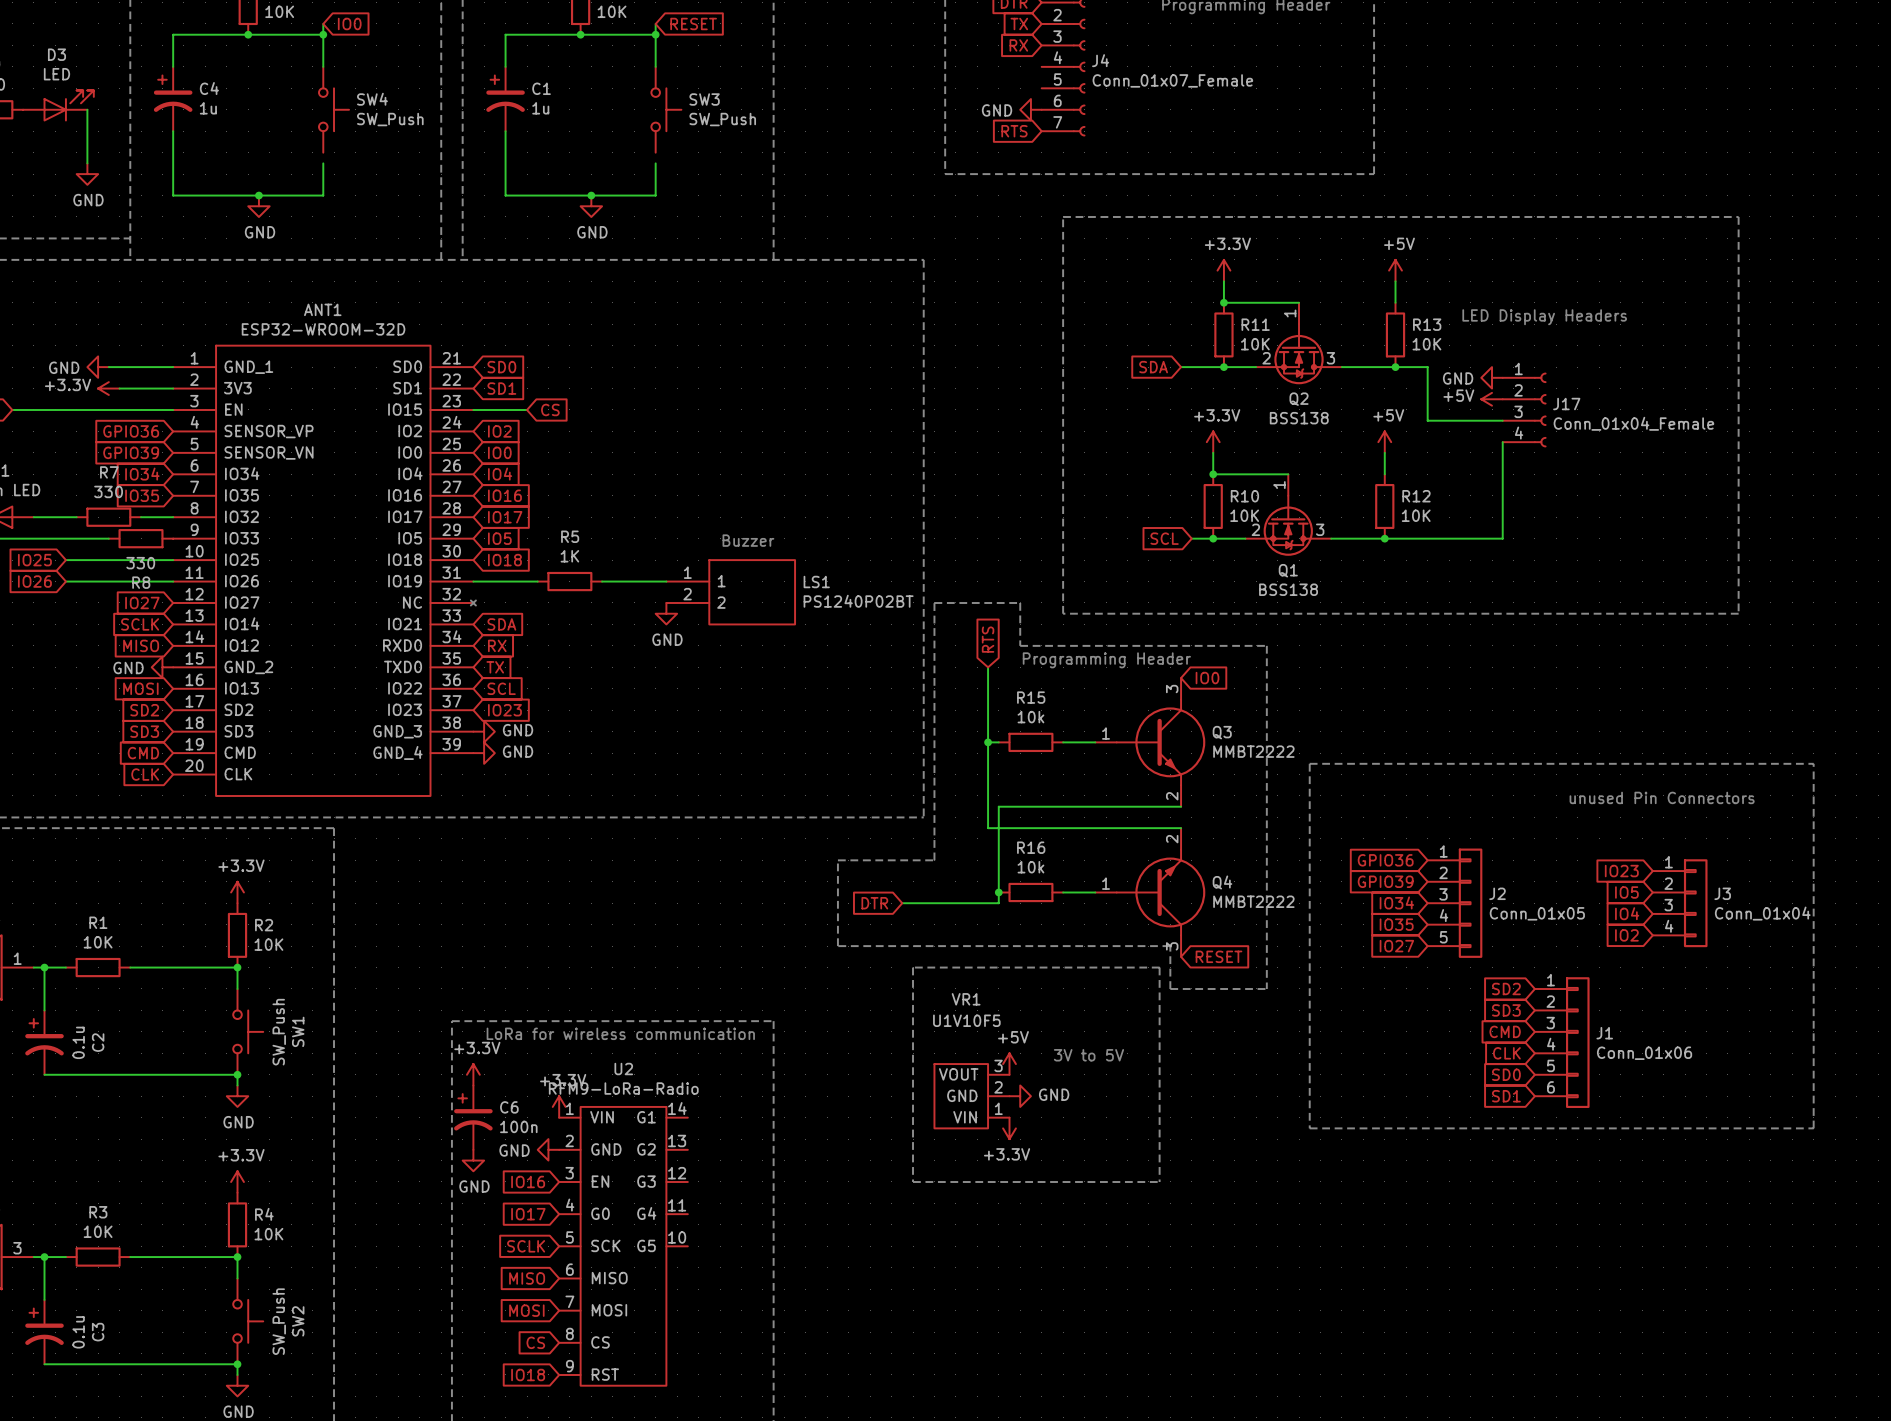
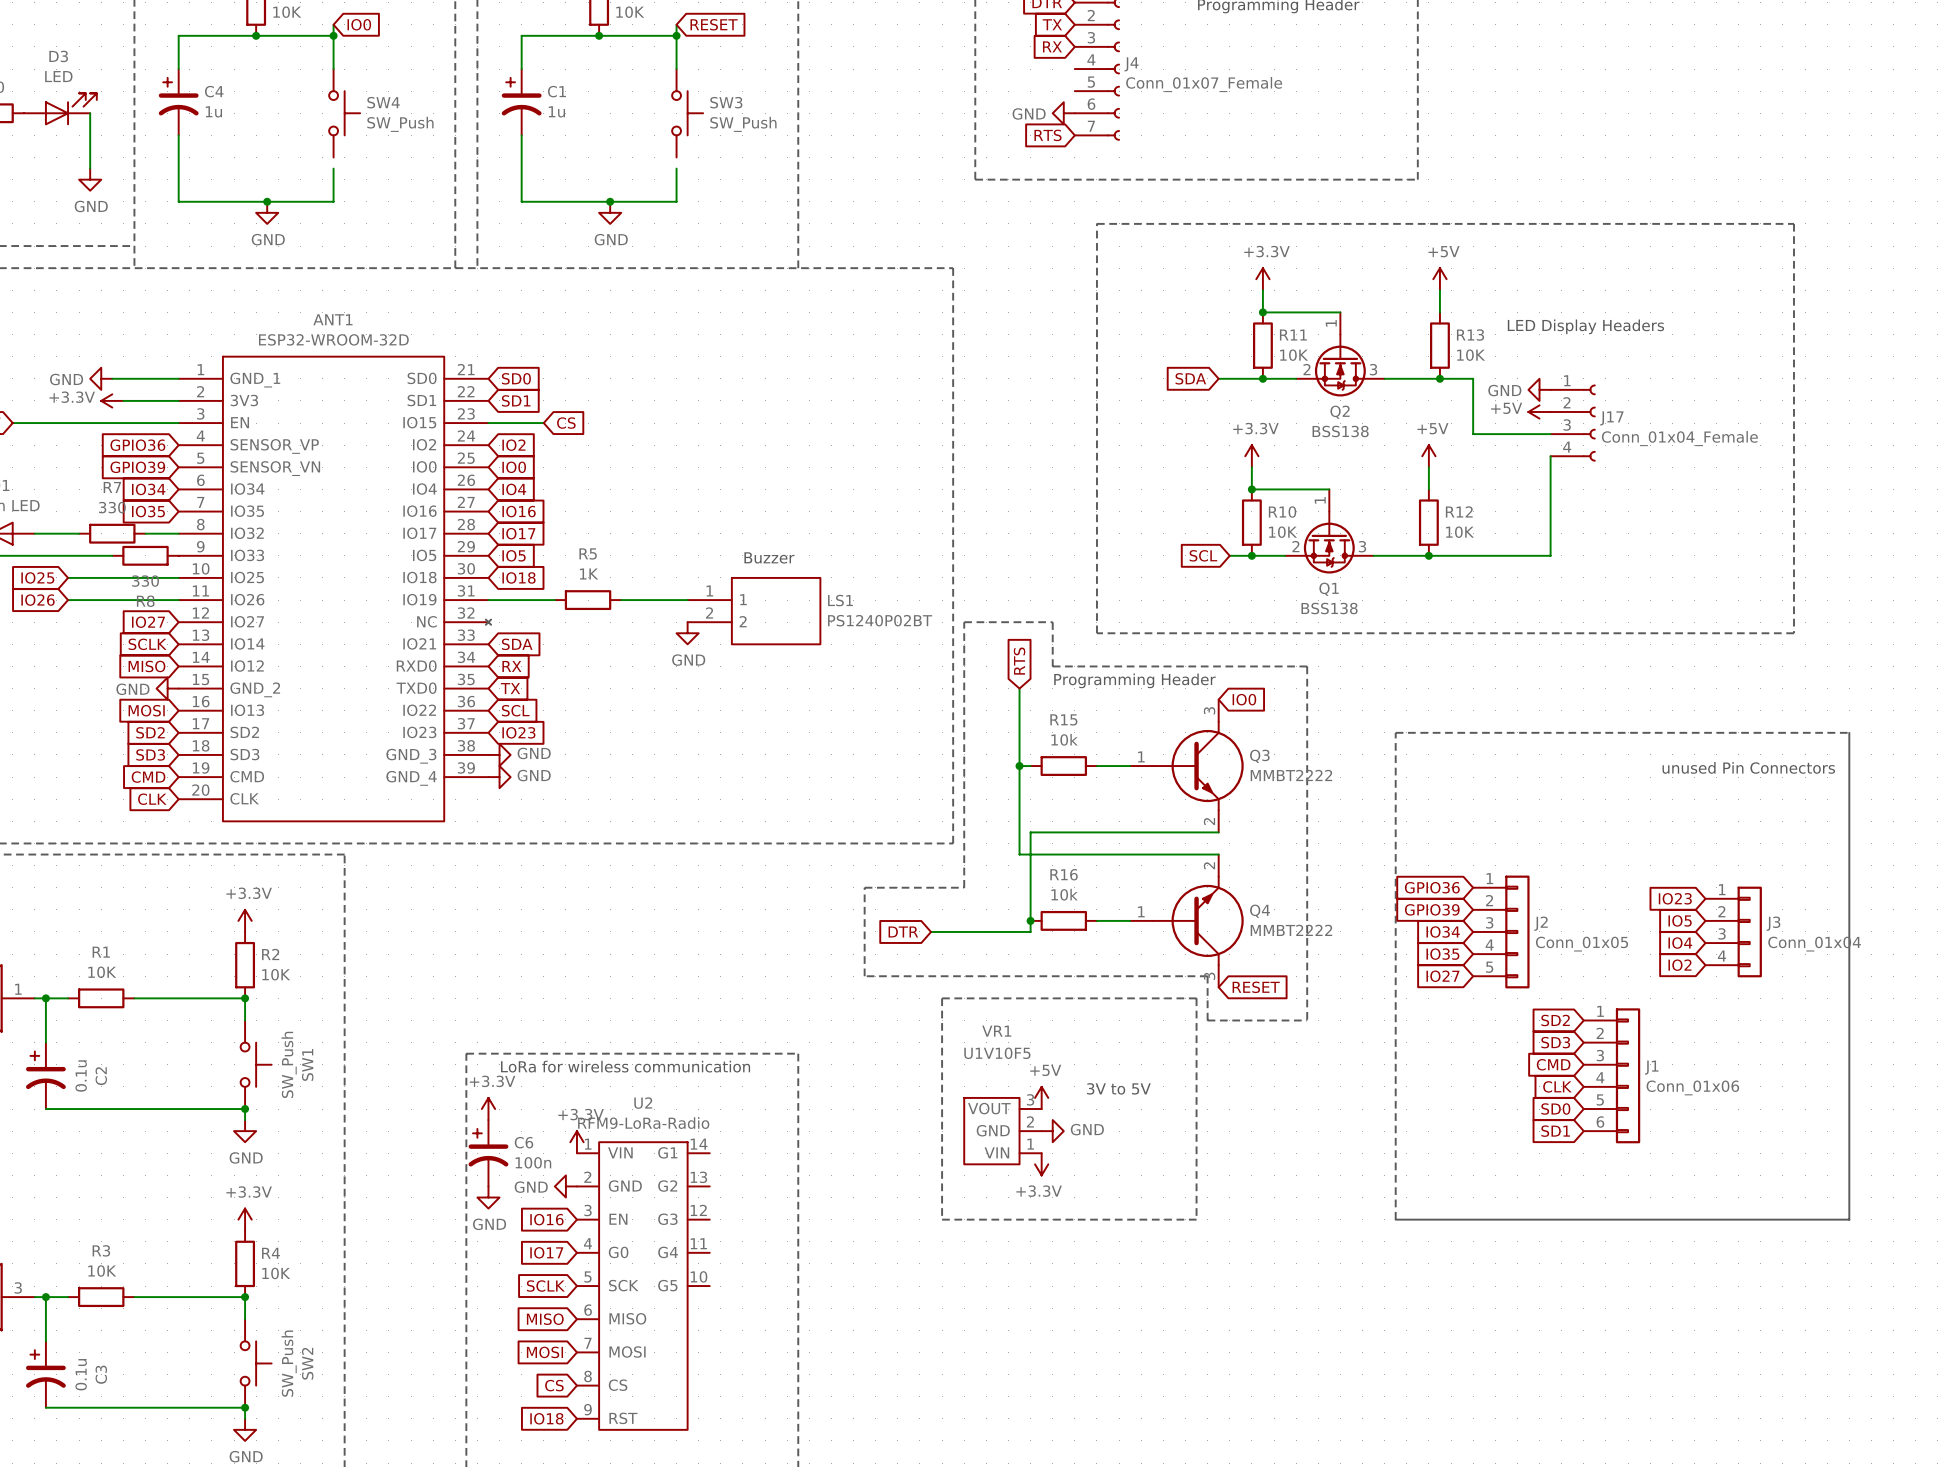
line: none -> (1849, 732) (1395, 732) (1395, 1219)
bus: none -> (1849, 732) (1849, 1219) (1395, 1219)
line: (1309, 763) (1309, 1128) (1813, 1128) (1813, 763) (1309, 763) -> none
text position: unused Pin Connectors (1662, 797) -> unused Pin Connectors (1748, 767)

